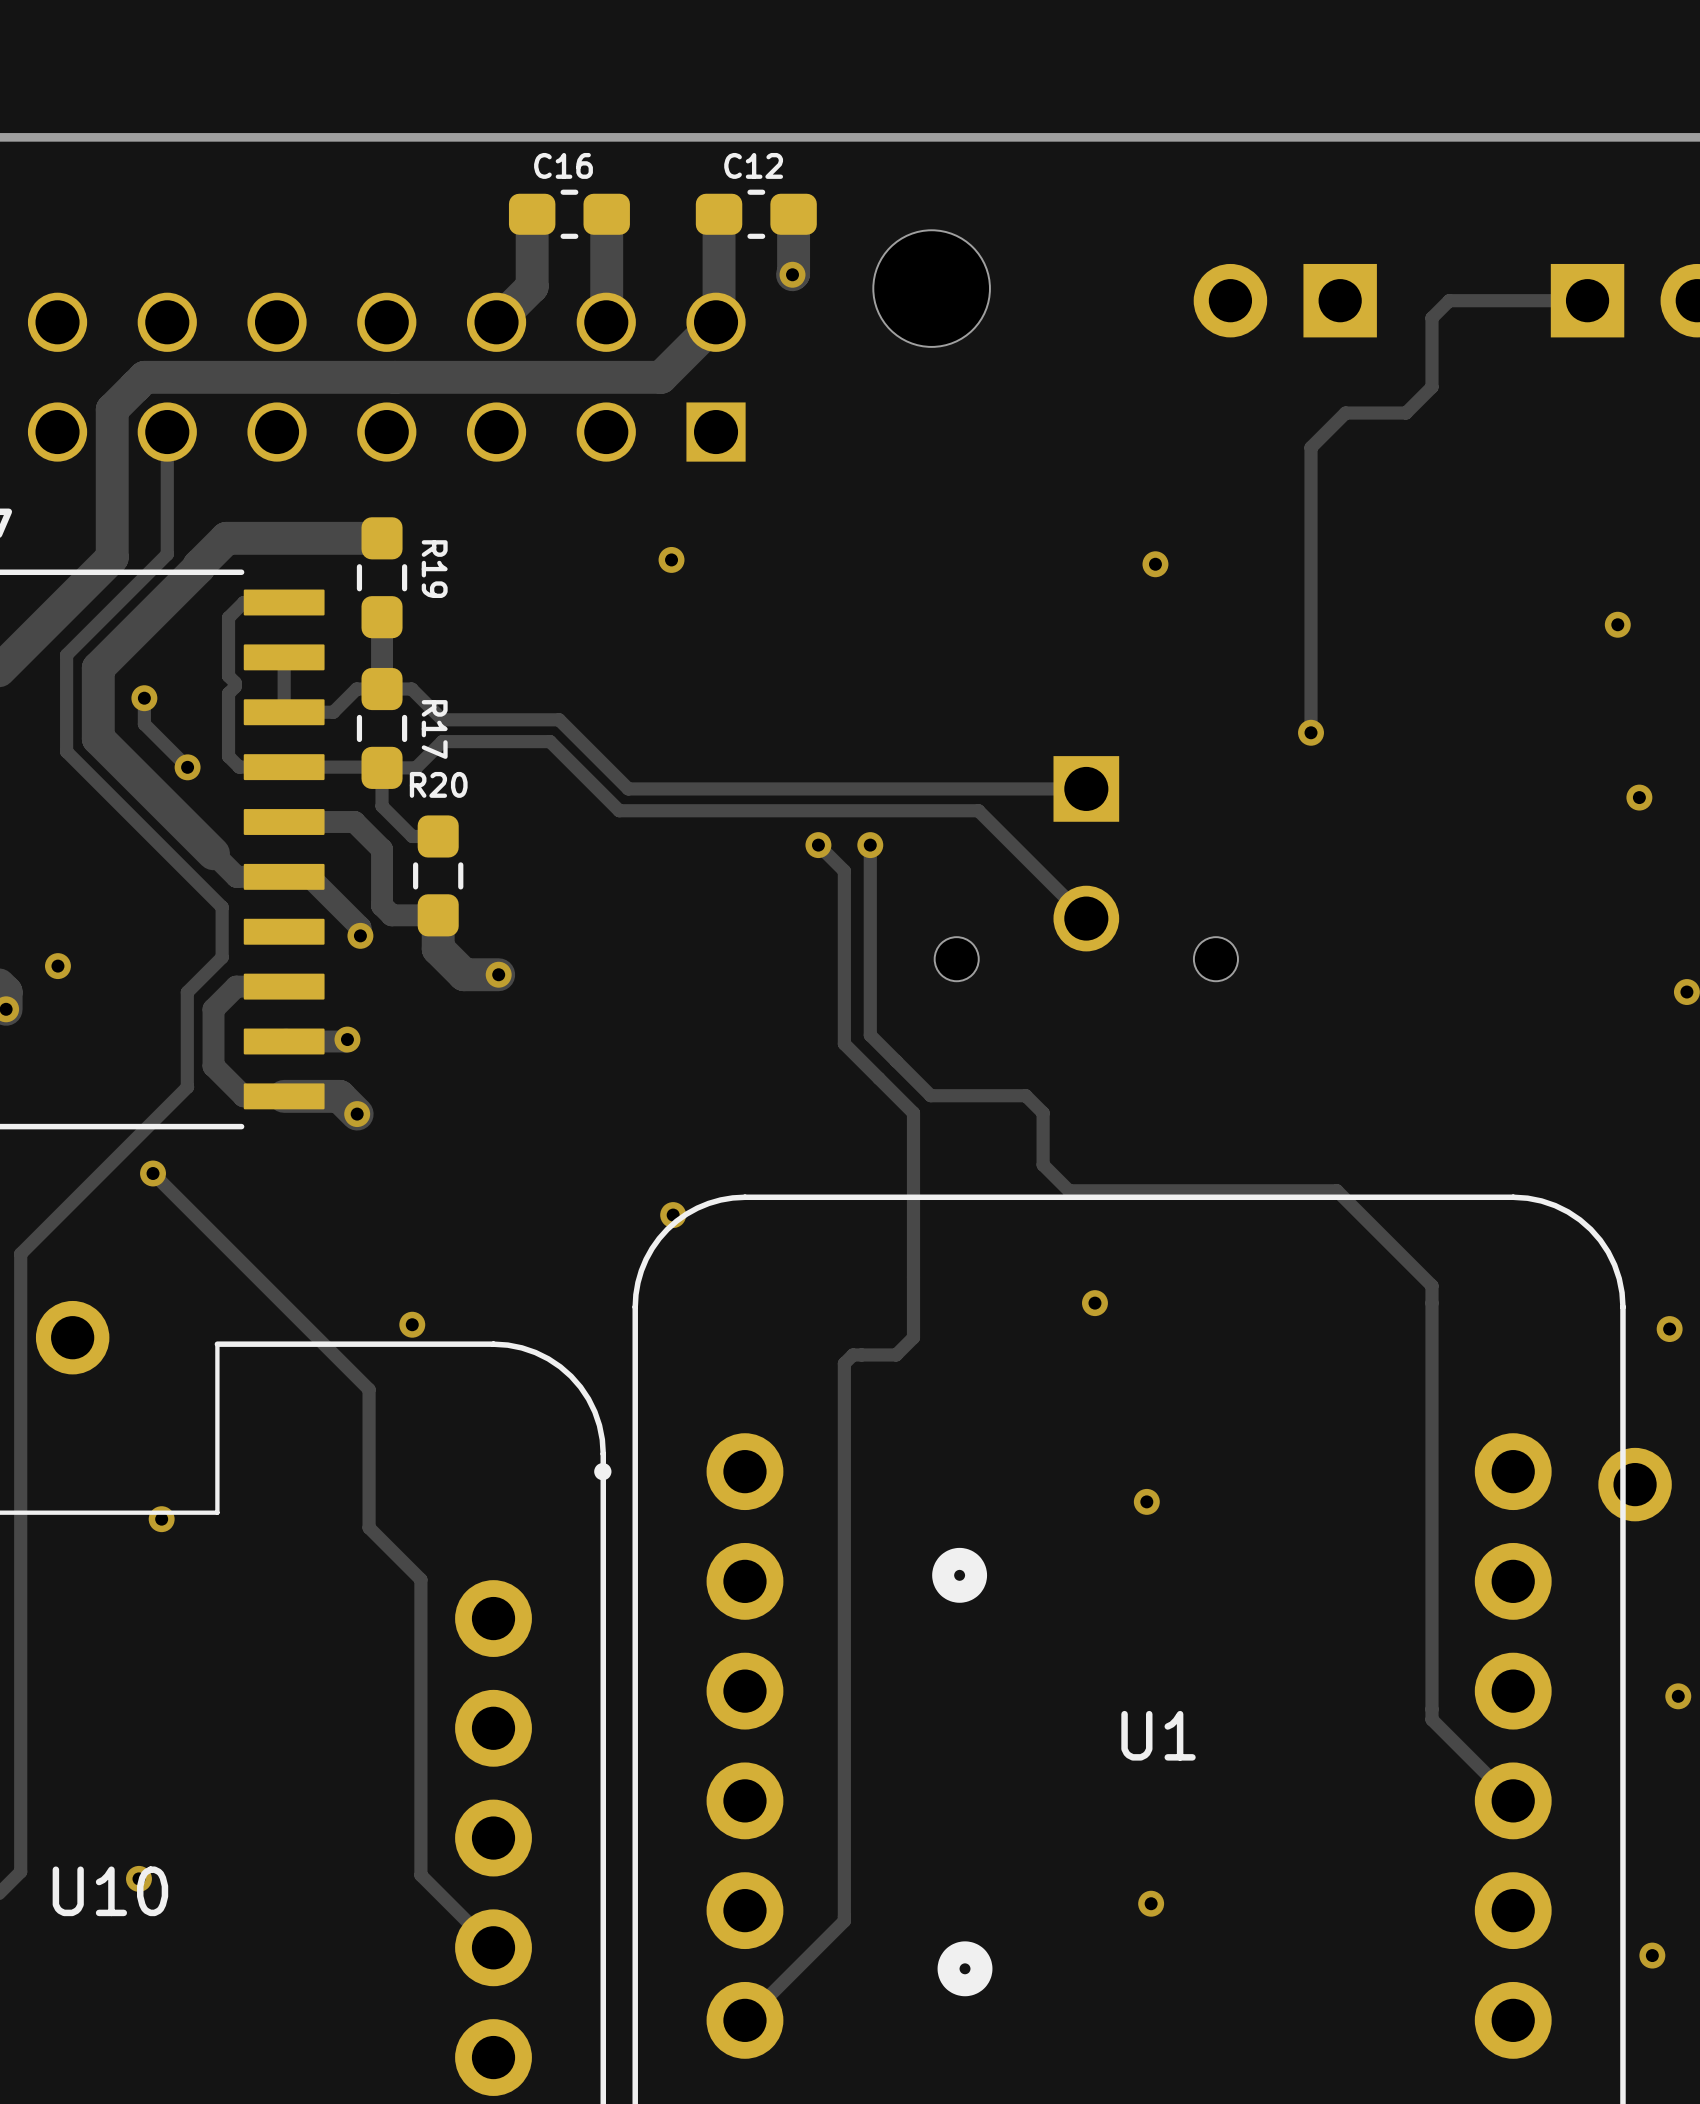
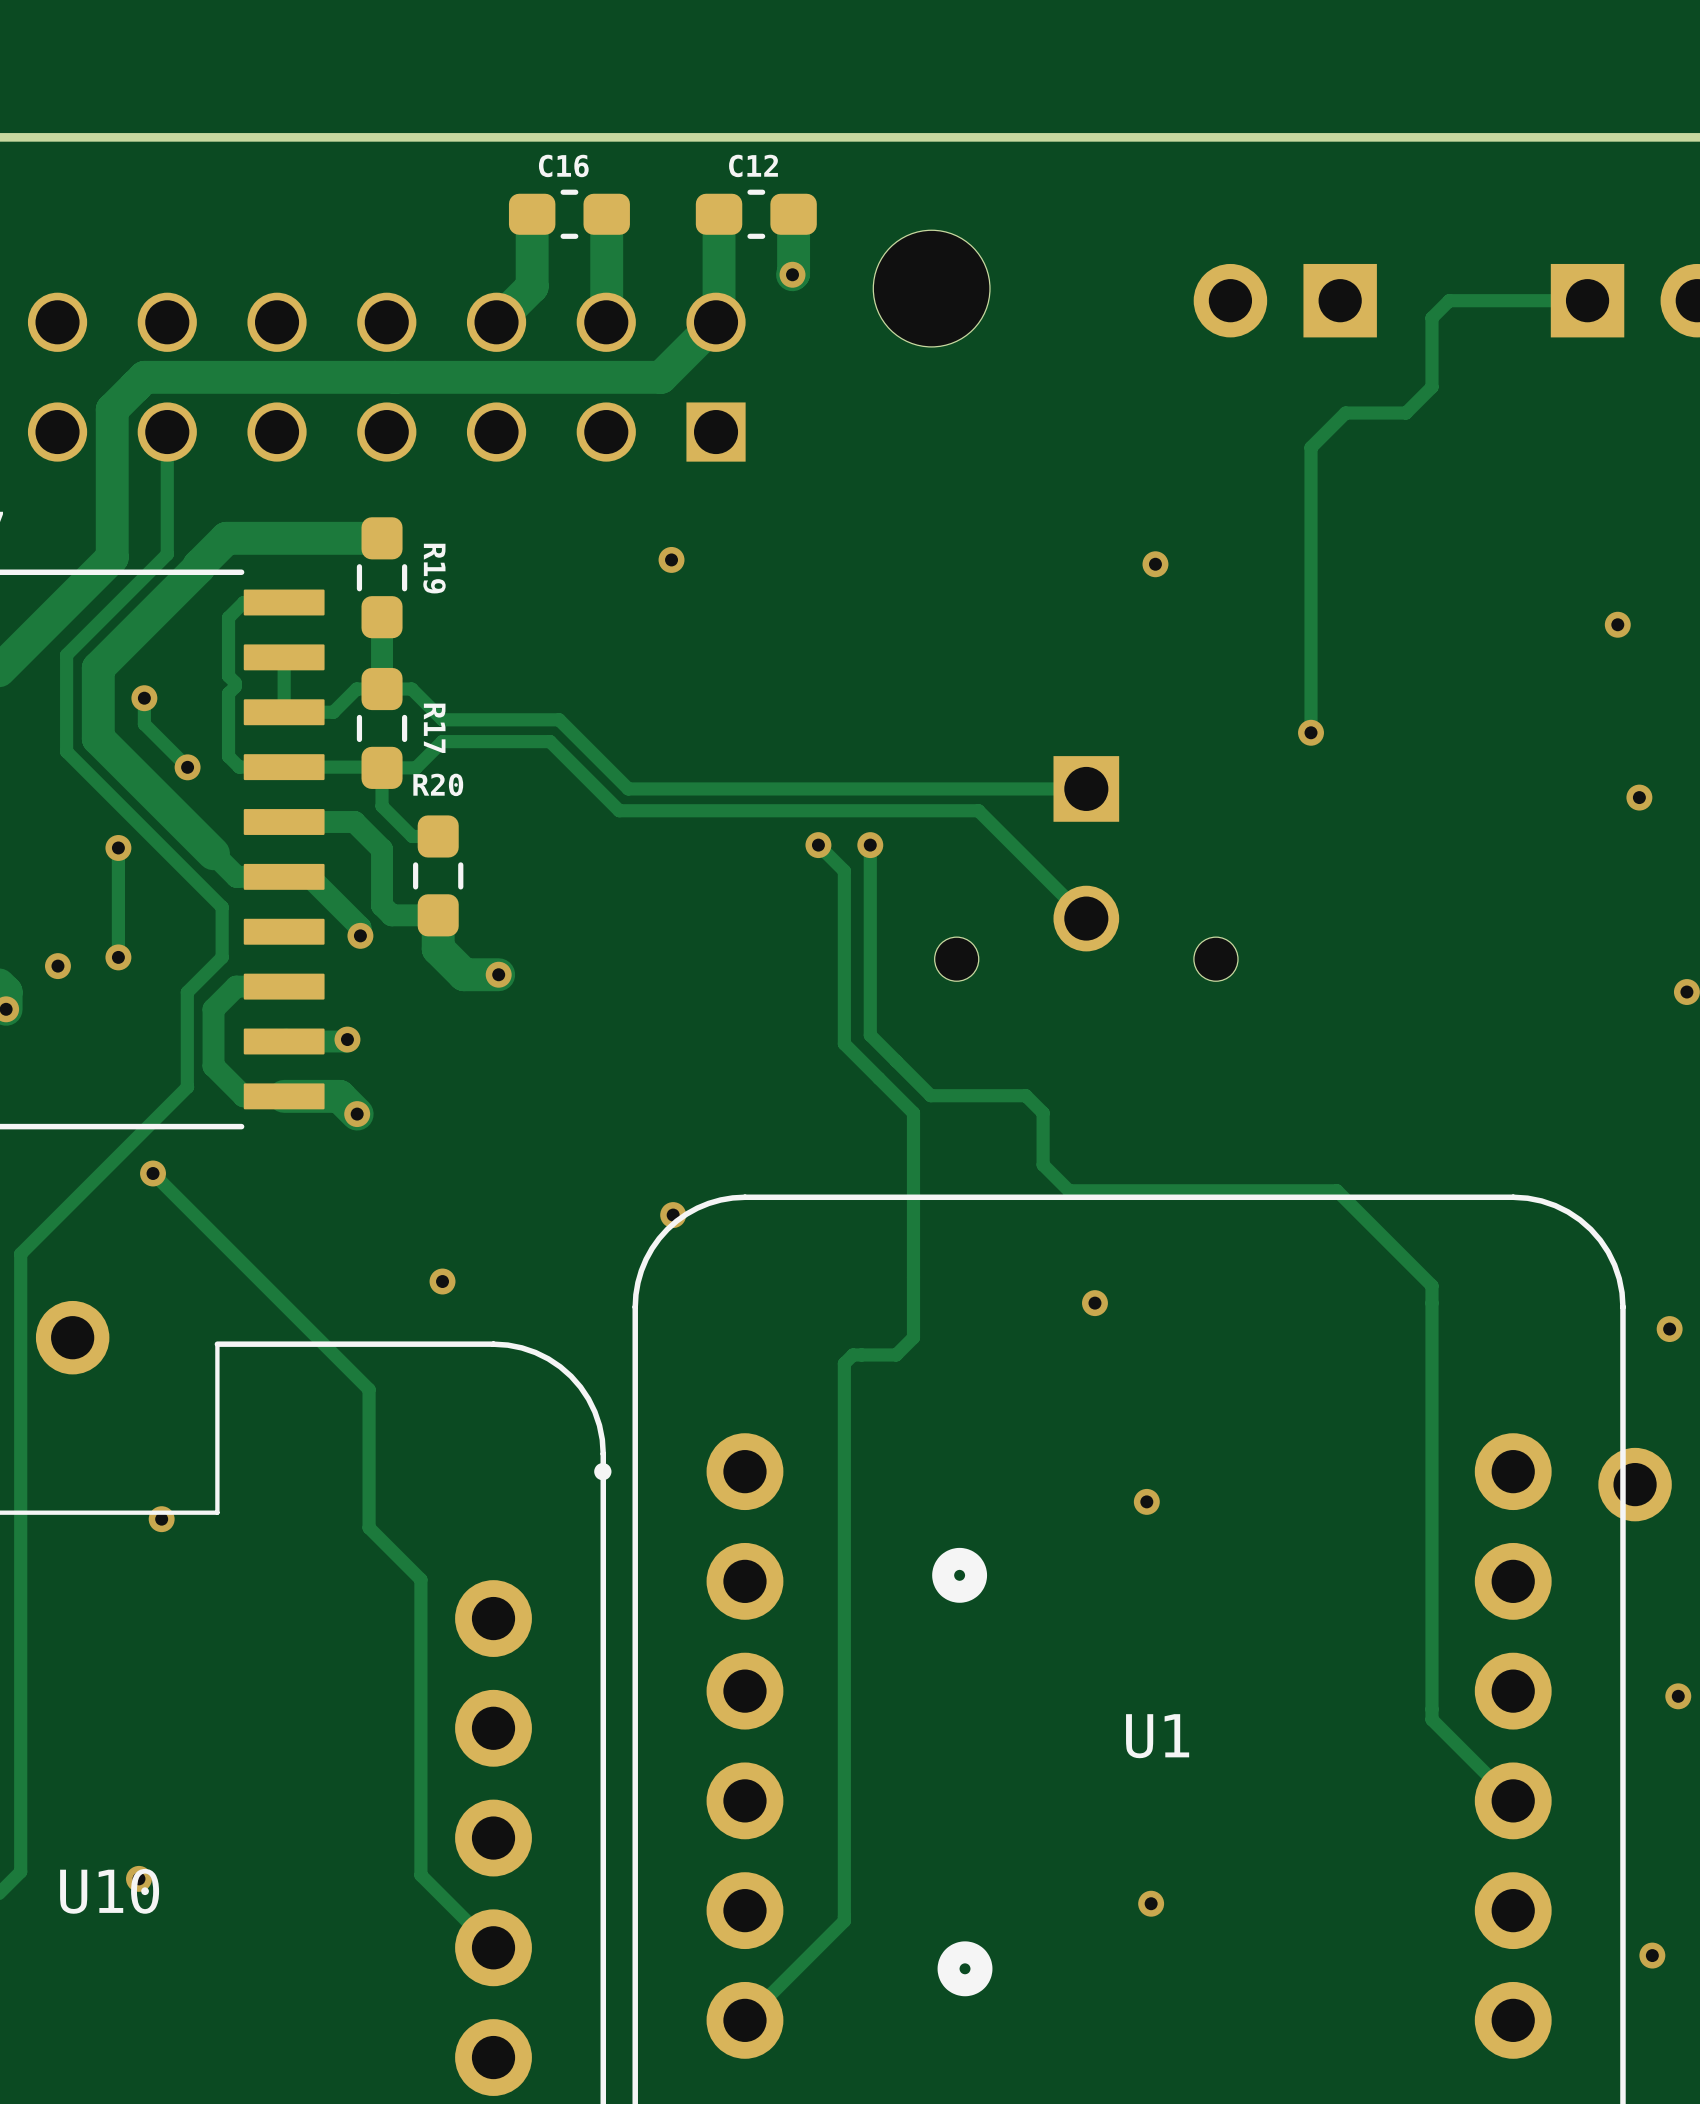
track: none -> (118, 847) (118, 957)
via: none -> (118, 847)
via: none -> (118, 957)
via position: (412, 1324) -> (442, 1281)

